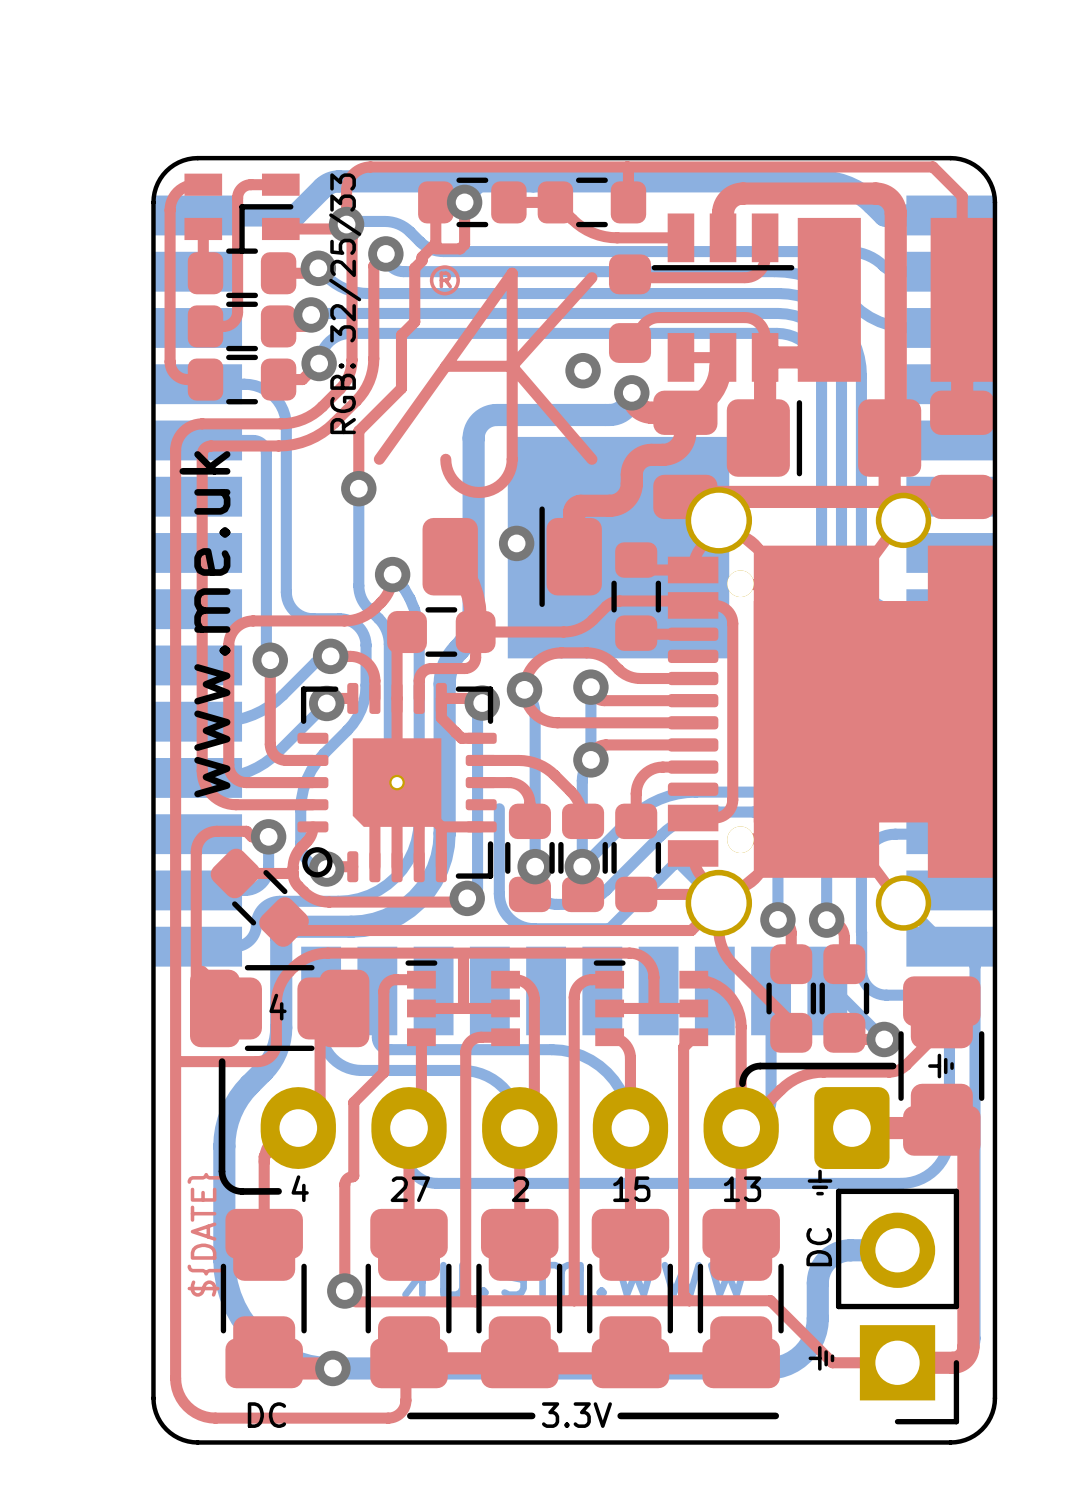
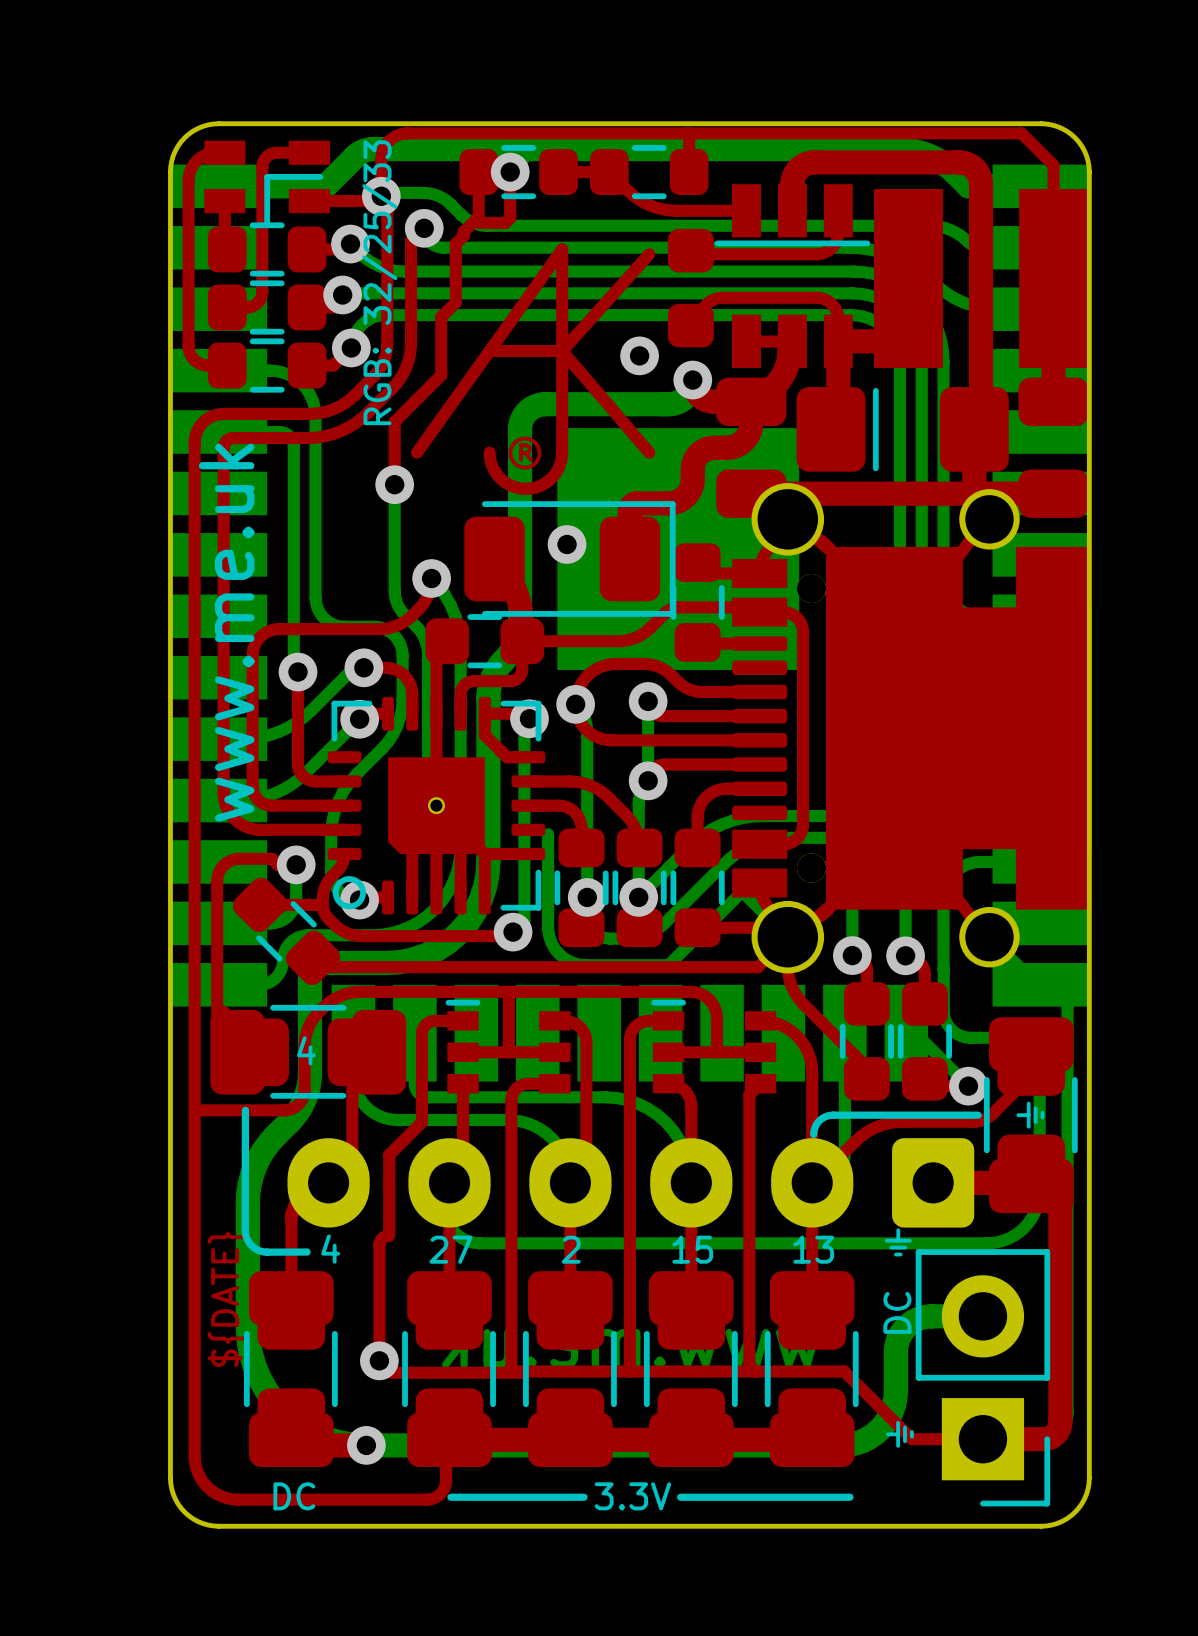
drawing shape: [373, 265, 598, 499] -> [411, 243, 656, 495]
part footprint: [422, 506, 602, 607] -> [464, 501, 676, 617]

